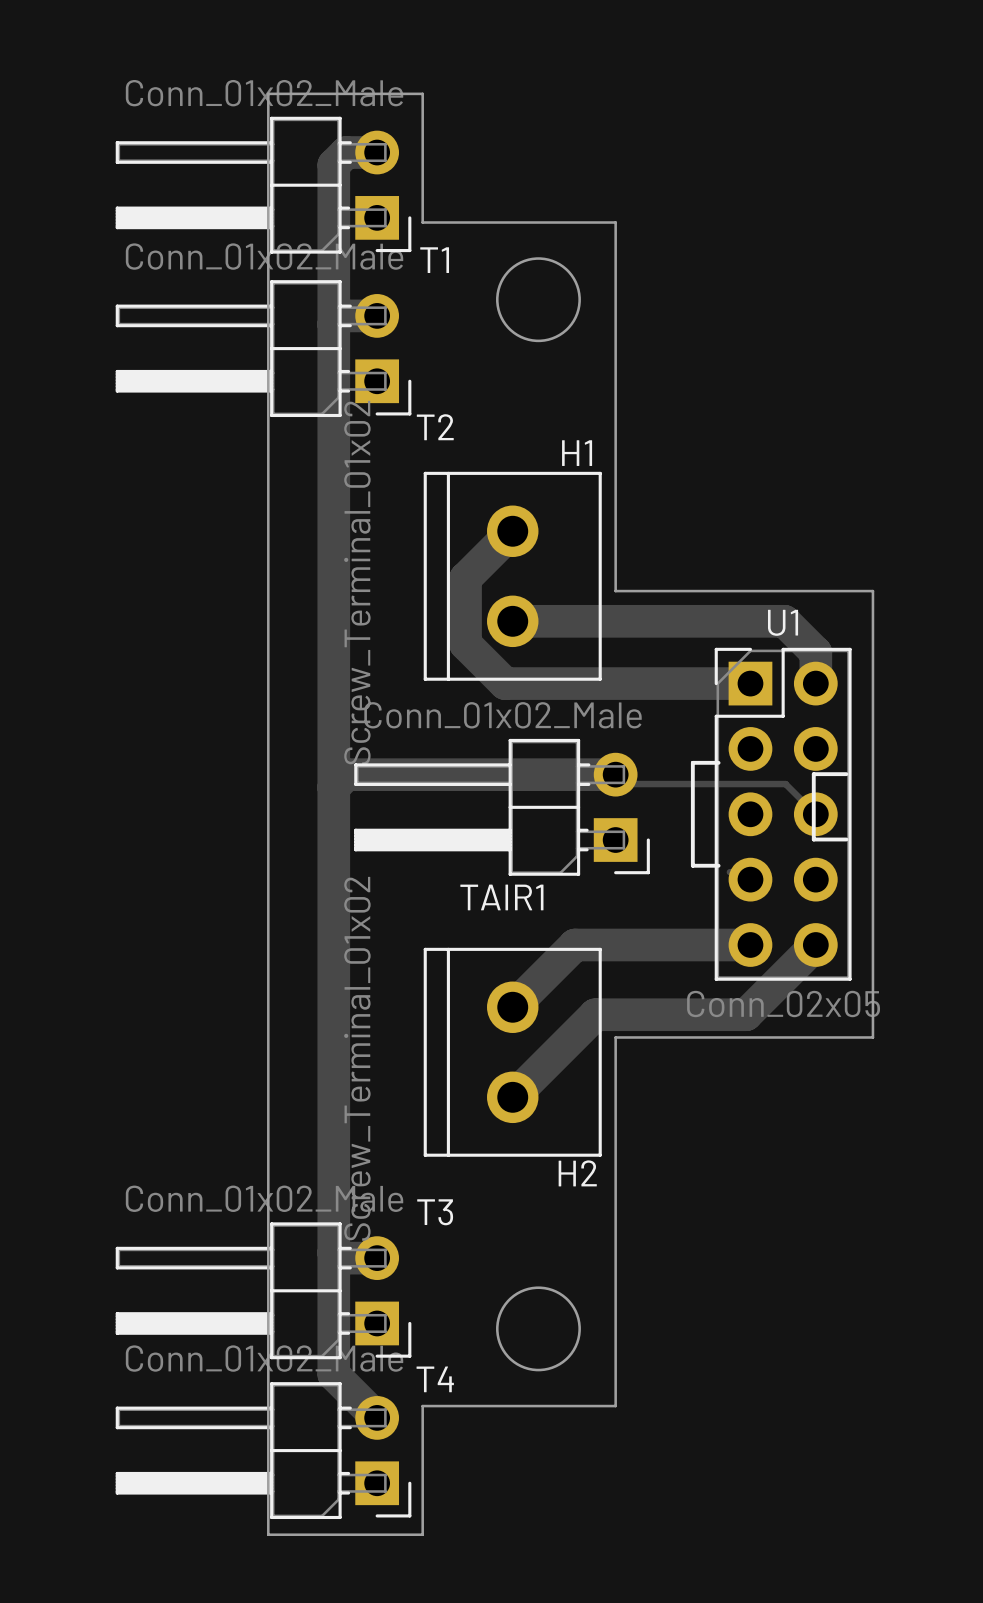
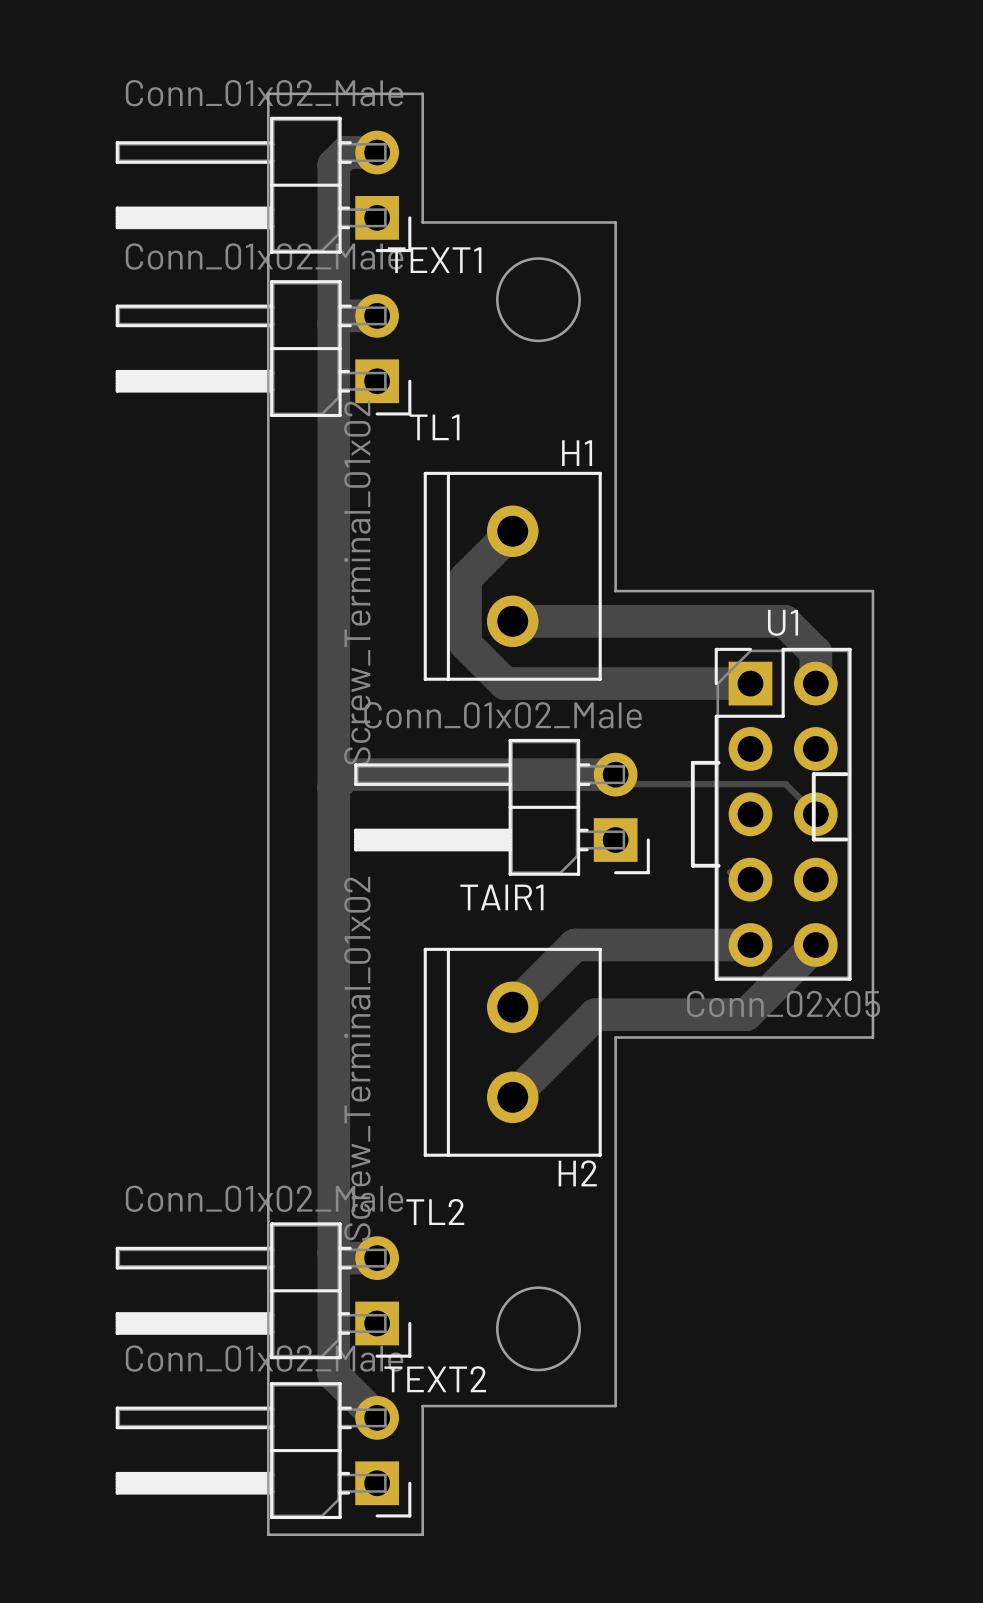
T1 name: T1 (434, 260) -> TEXT1 (434, 260)
T2 name: T2 (435, 427) -> TL1 (434, 427)
T3 name: T3 (435, 1212) -> TL2 (435, 1211)
T4 name: T4 (435, 1379) -> TEXT2 (435, 1379)

